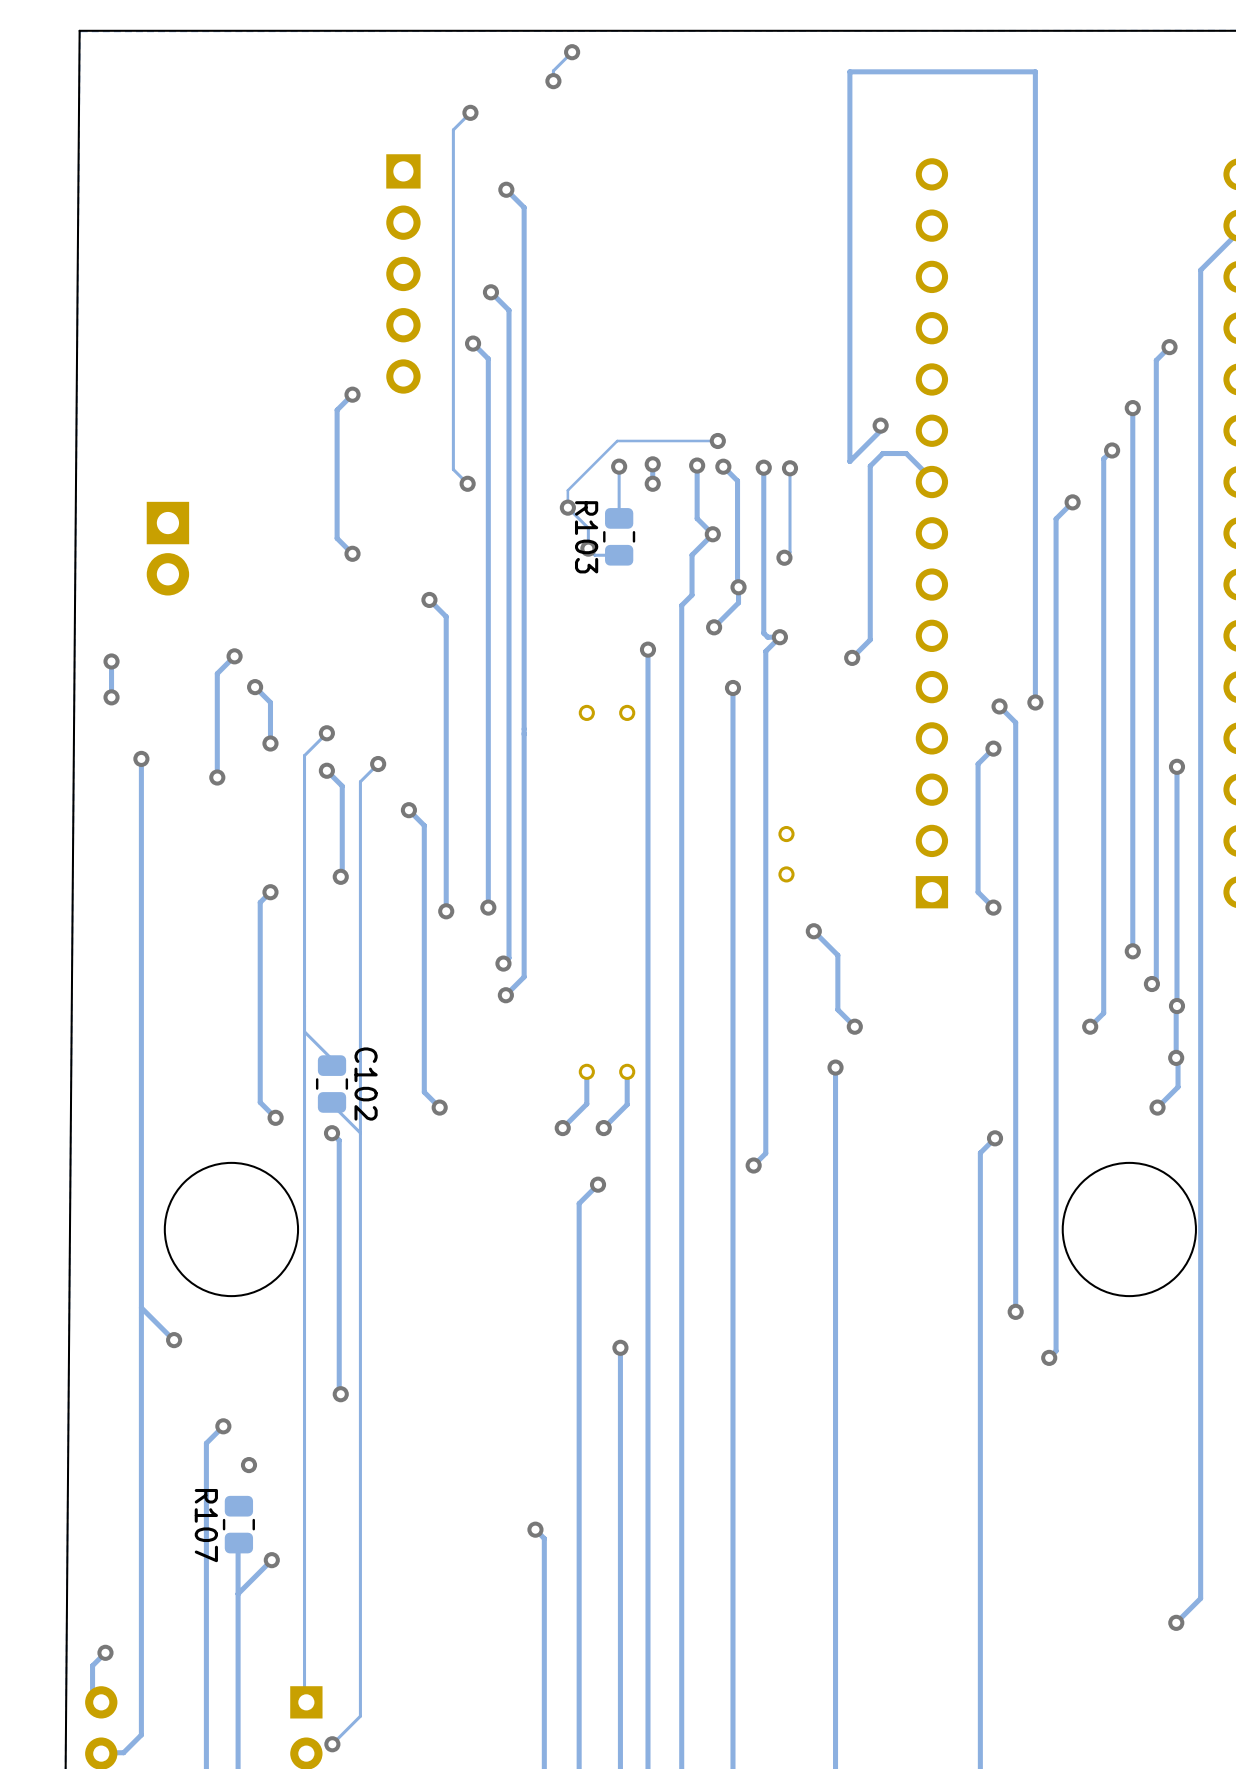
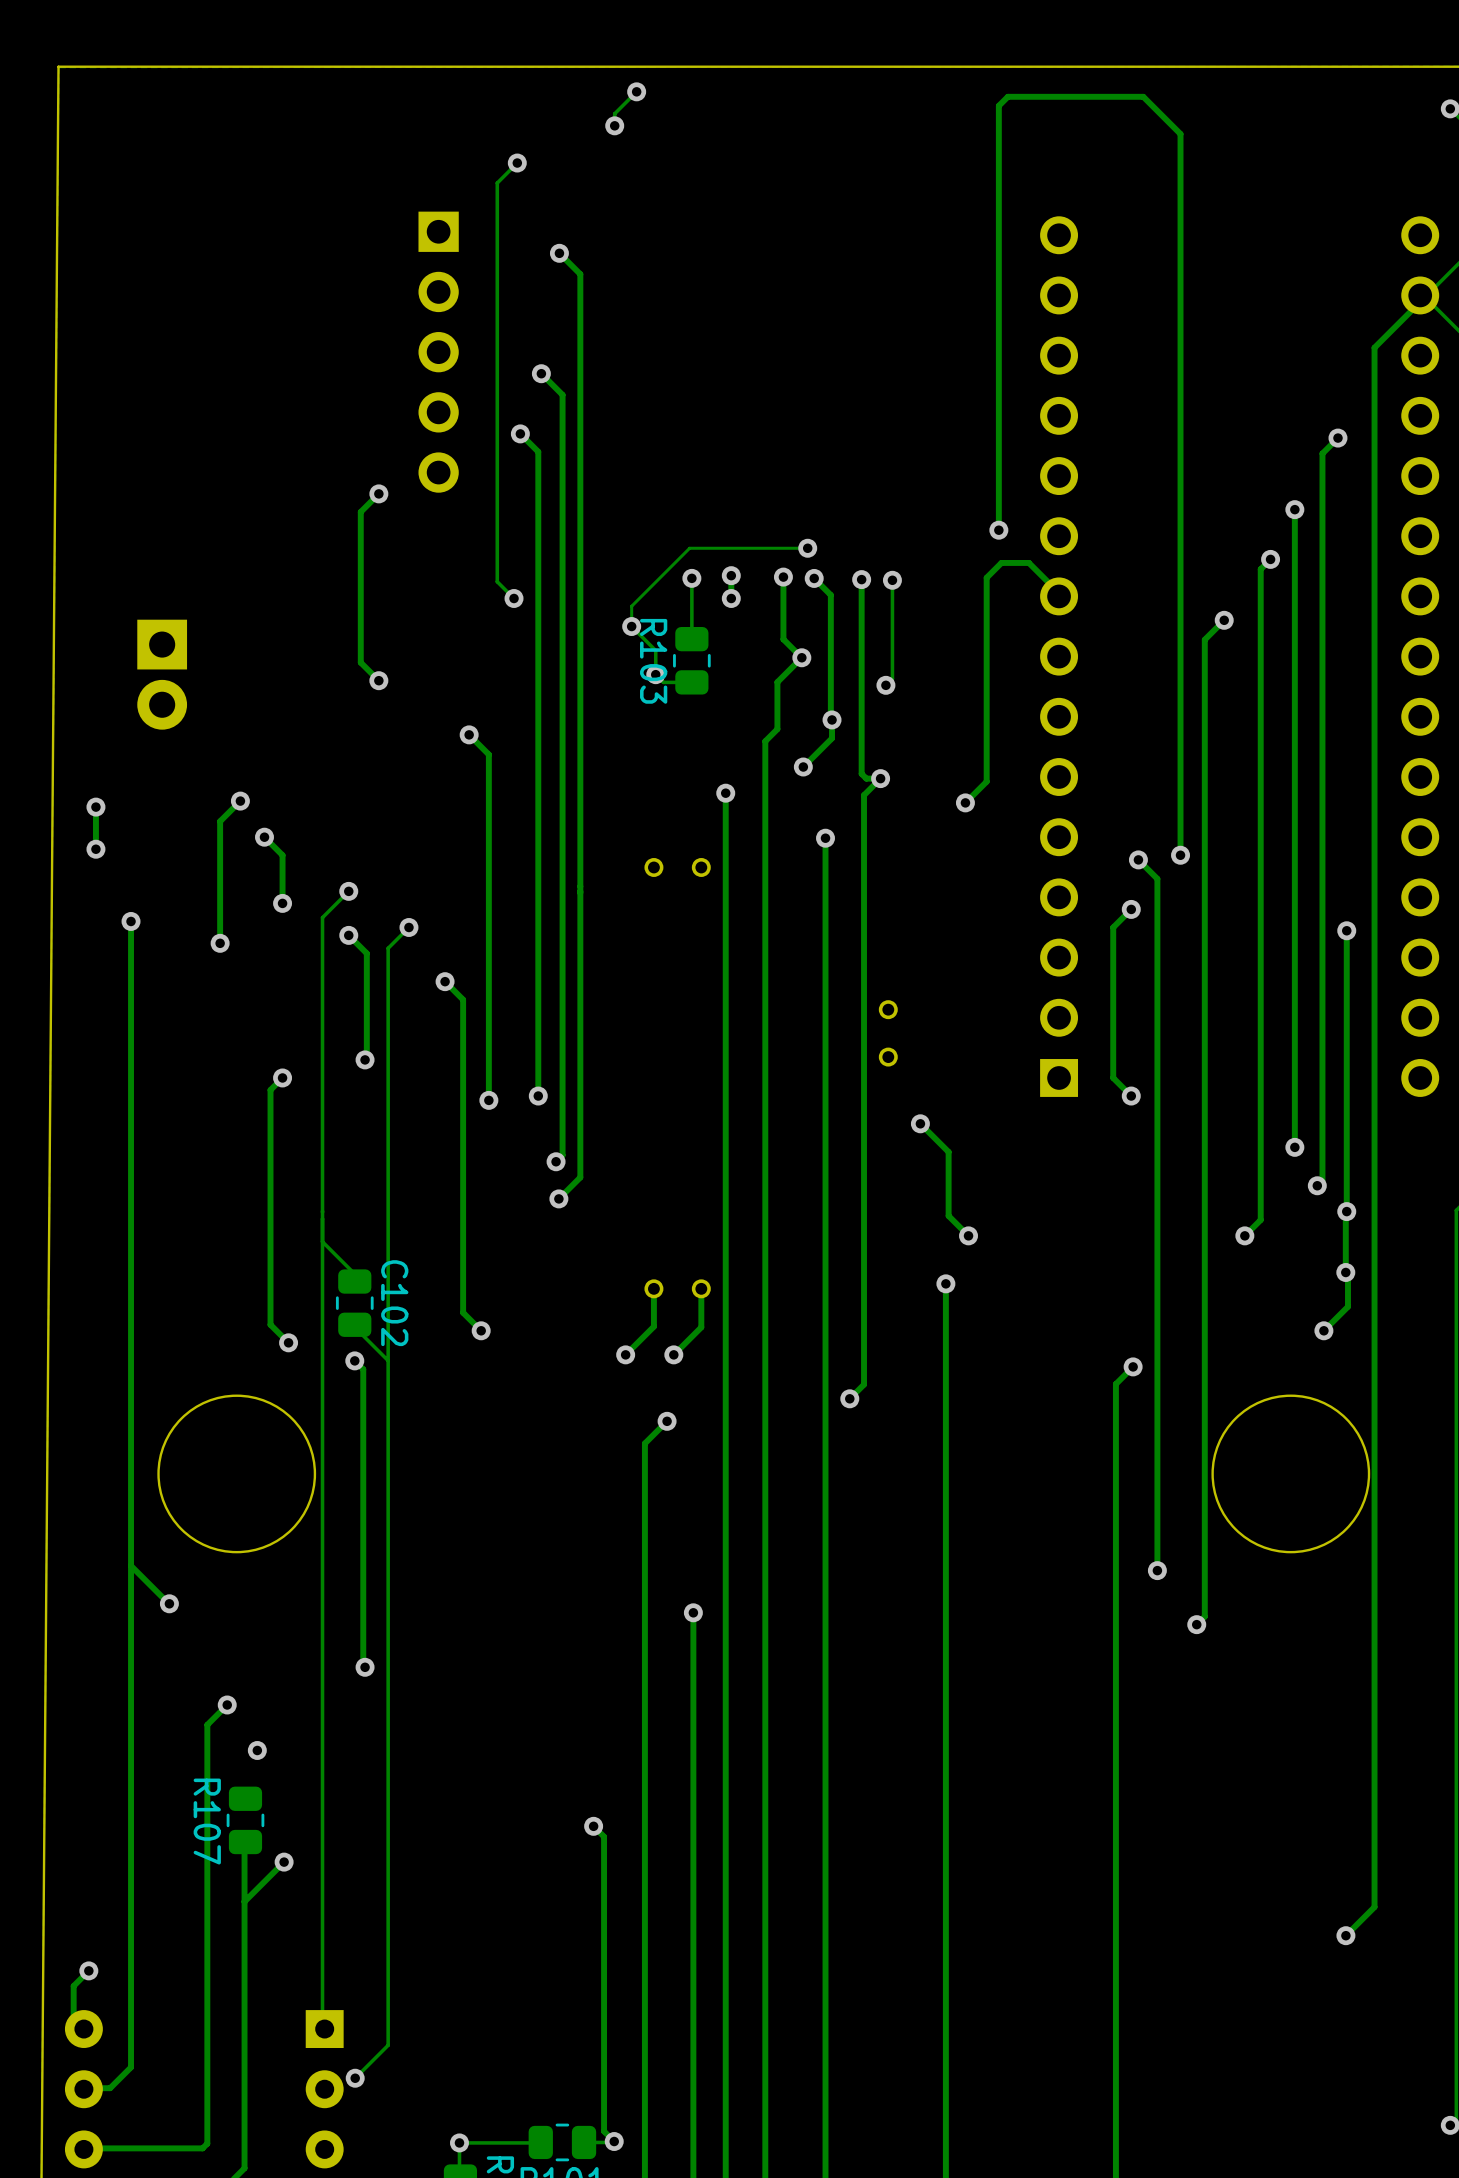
track: (1035, 88) (1035, 71) (849, 71) (849, 461) (880, 430) (880, 425) -> (1180, 134) (1143, 96) (1007, 96) (998, 105) (998, 530)

